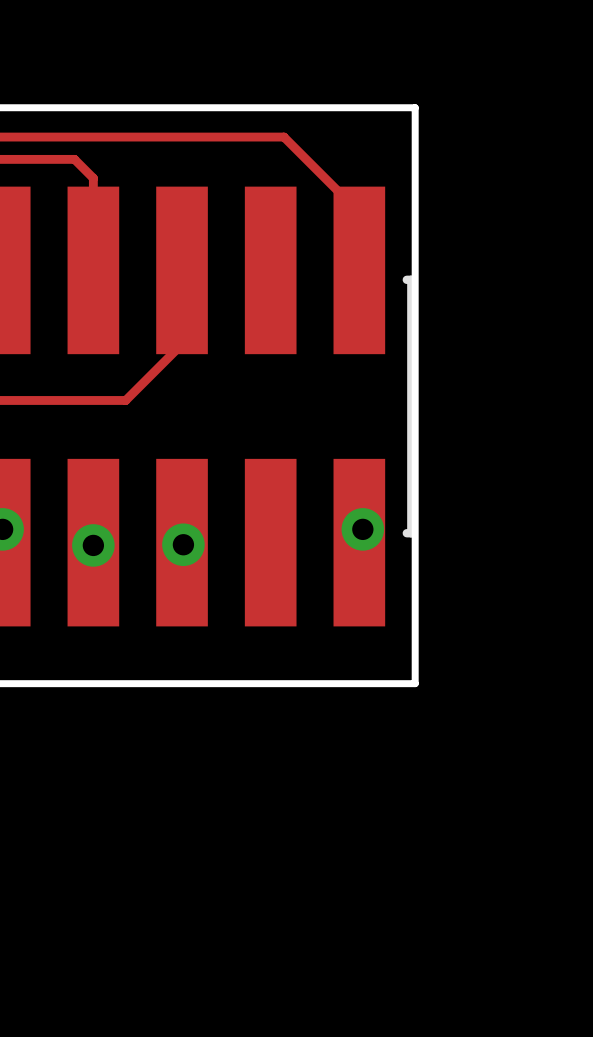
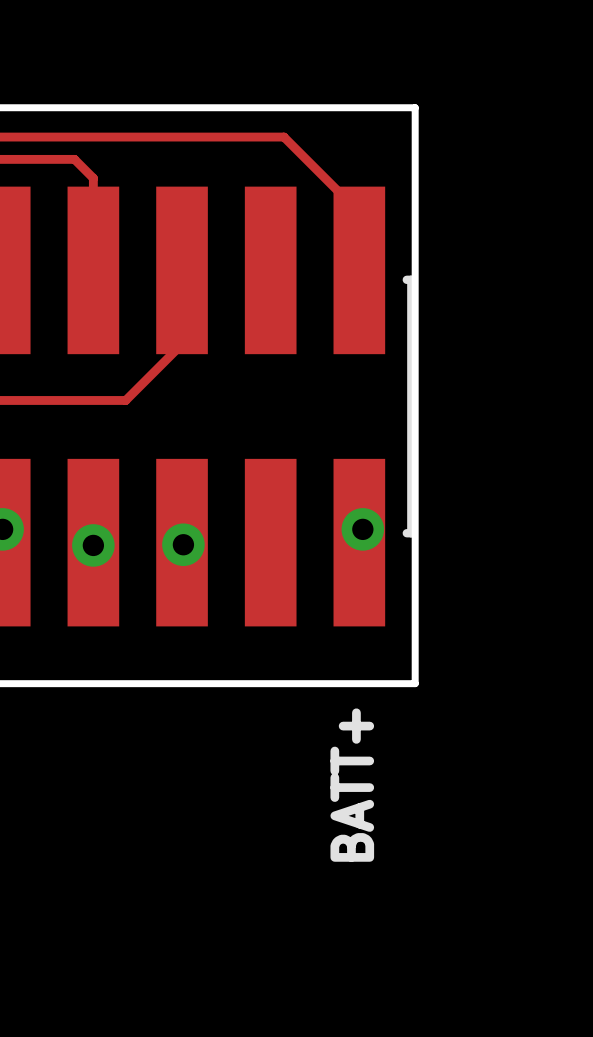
text: none -> BATT+ (352, 785)

